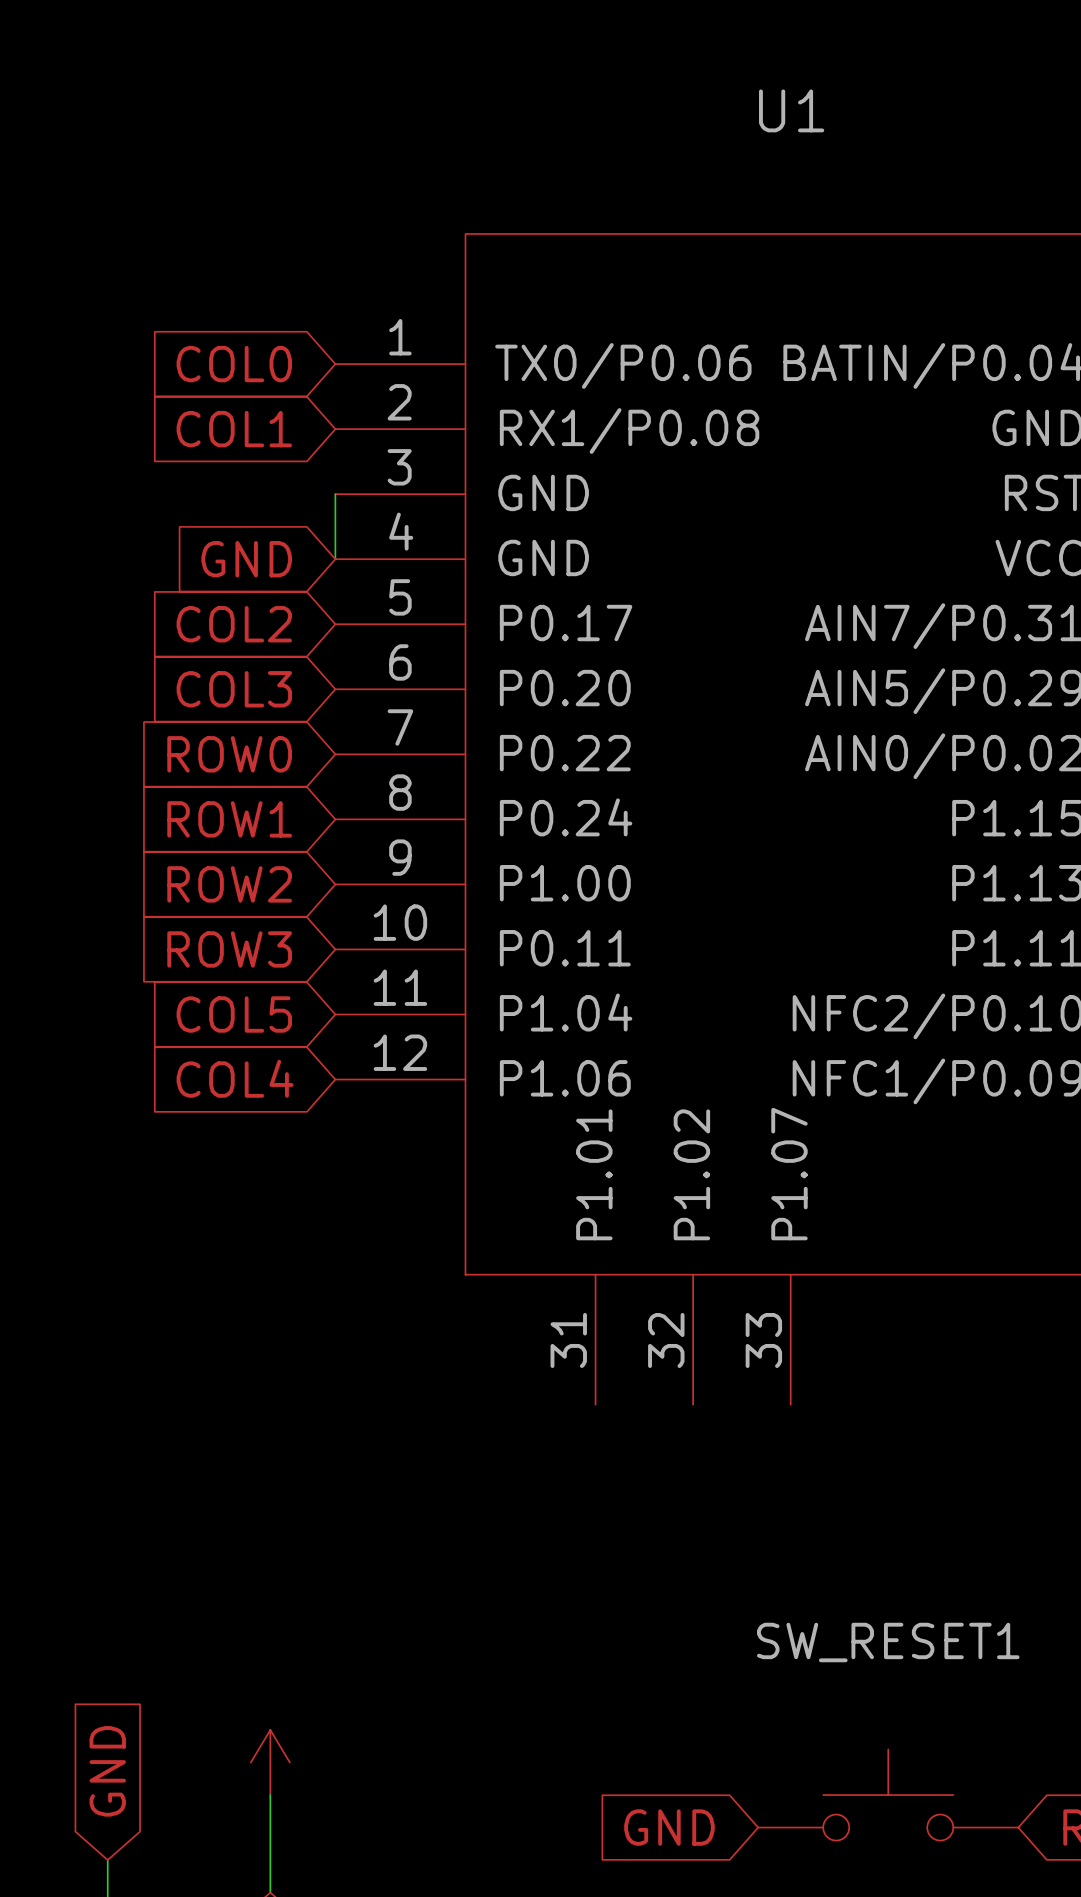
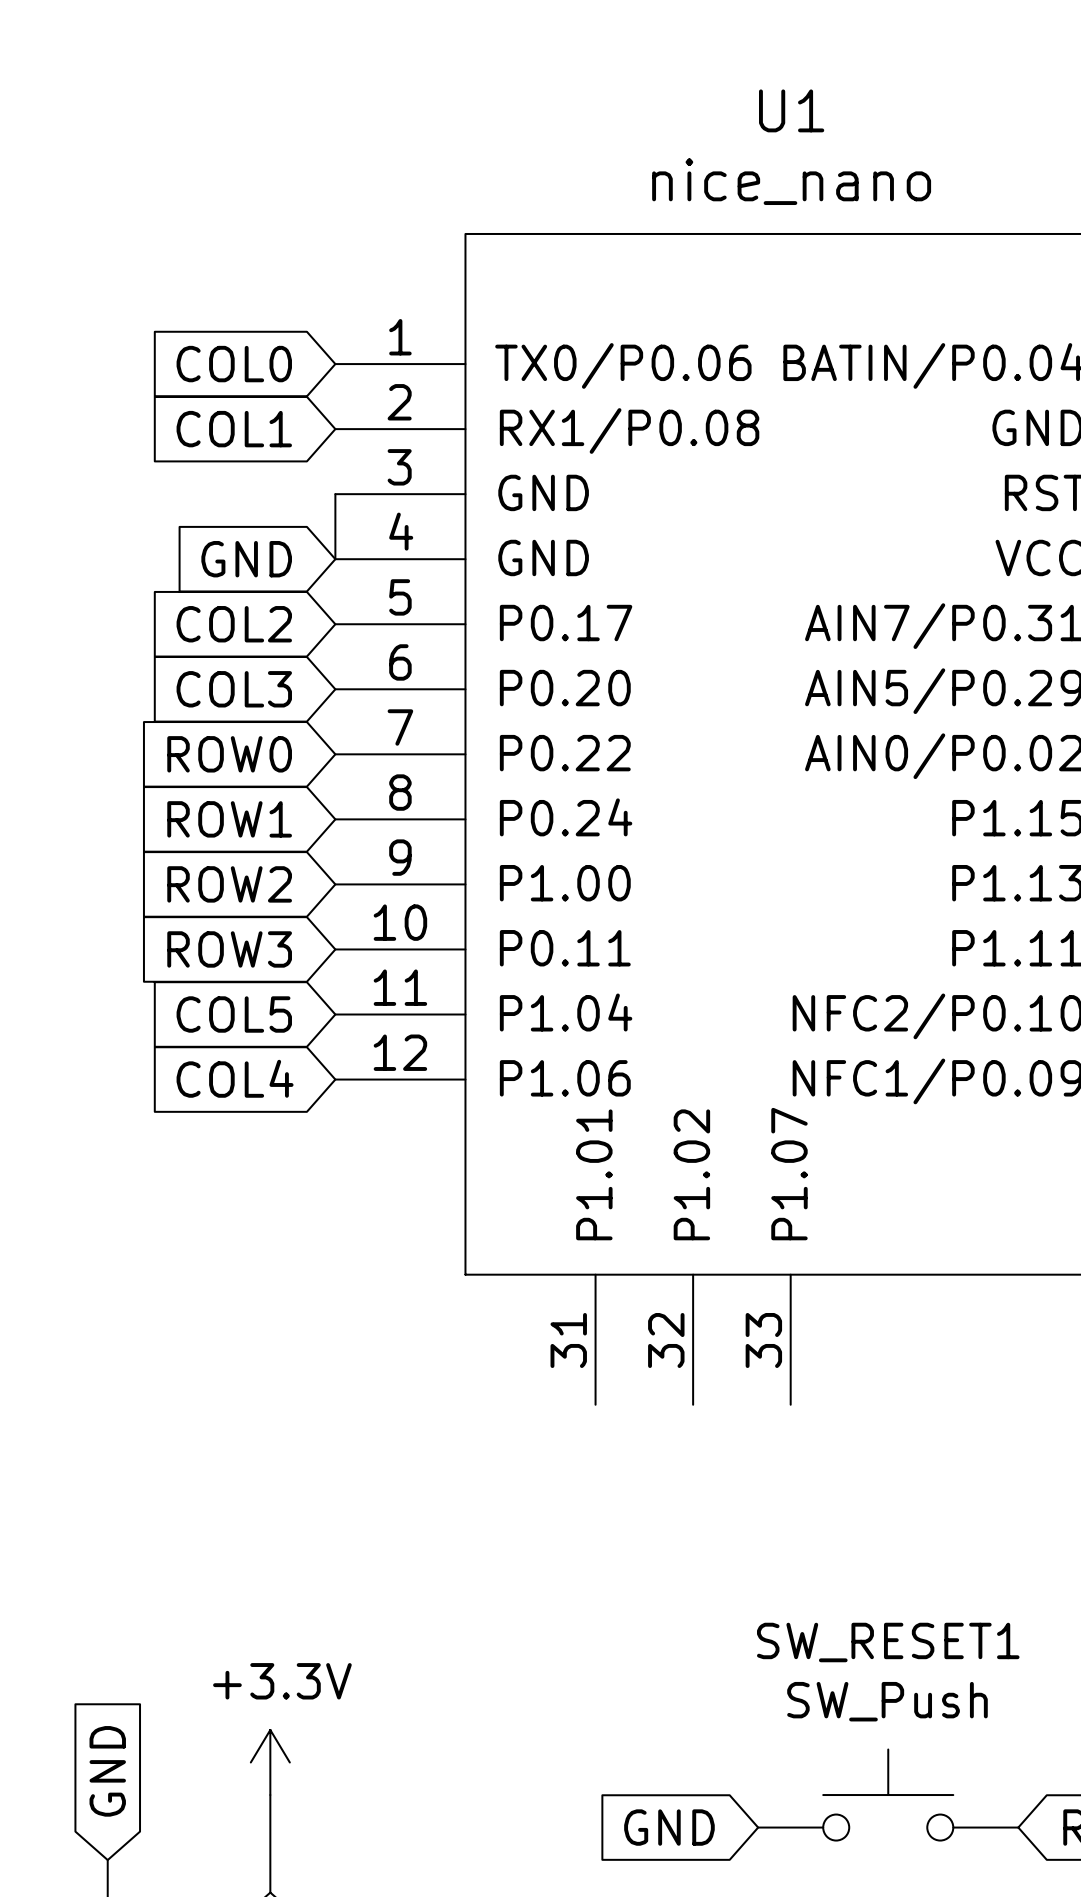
U1 value: none -> nice_nano (791, 181)
power symbol text: none -> +3.3V (282, 1681)
SW_RESET1 value: none -> SW_Push (887, 1701)

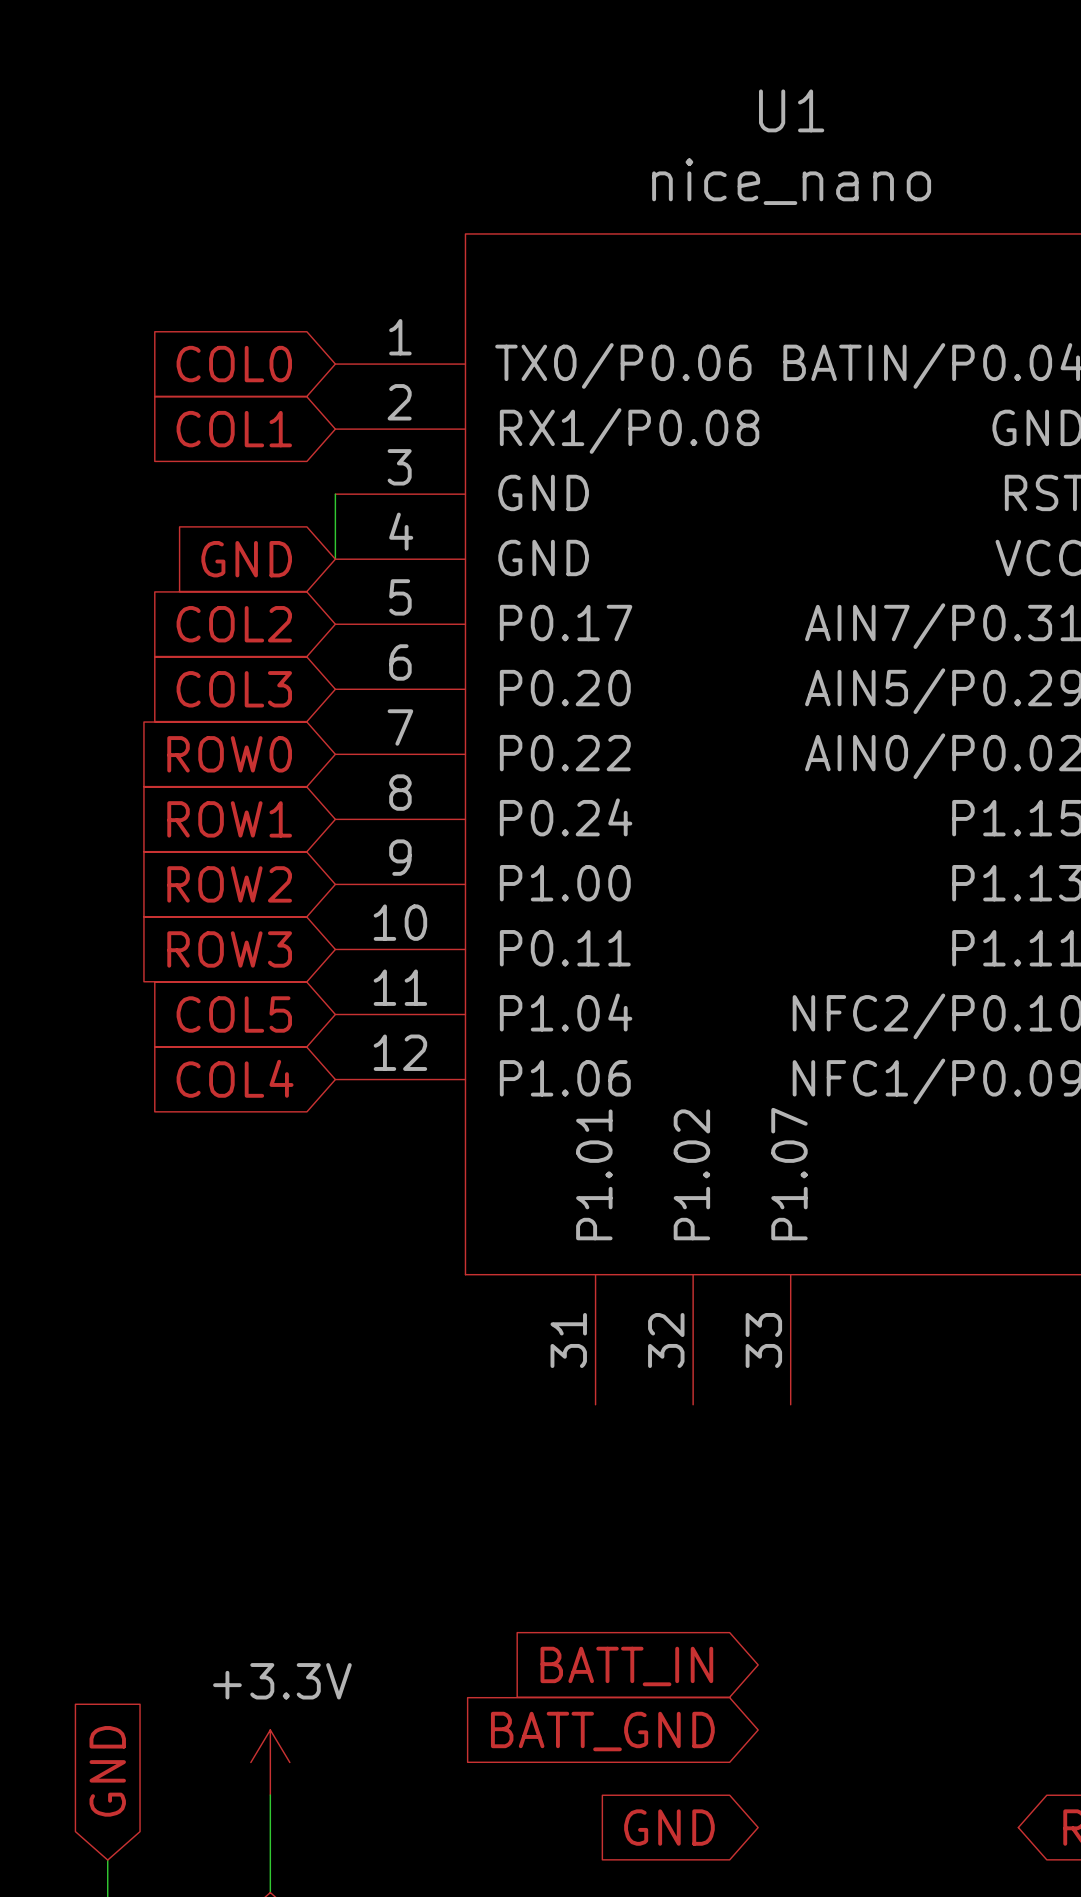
global label: none -> BATT_IN (626, 1666)
global label: none -> BATT_GND (602, 1731)
SW_RESET1: SW_Push (888, 1795) -> none

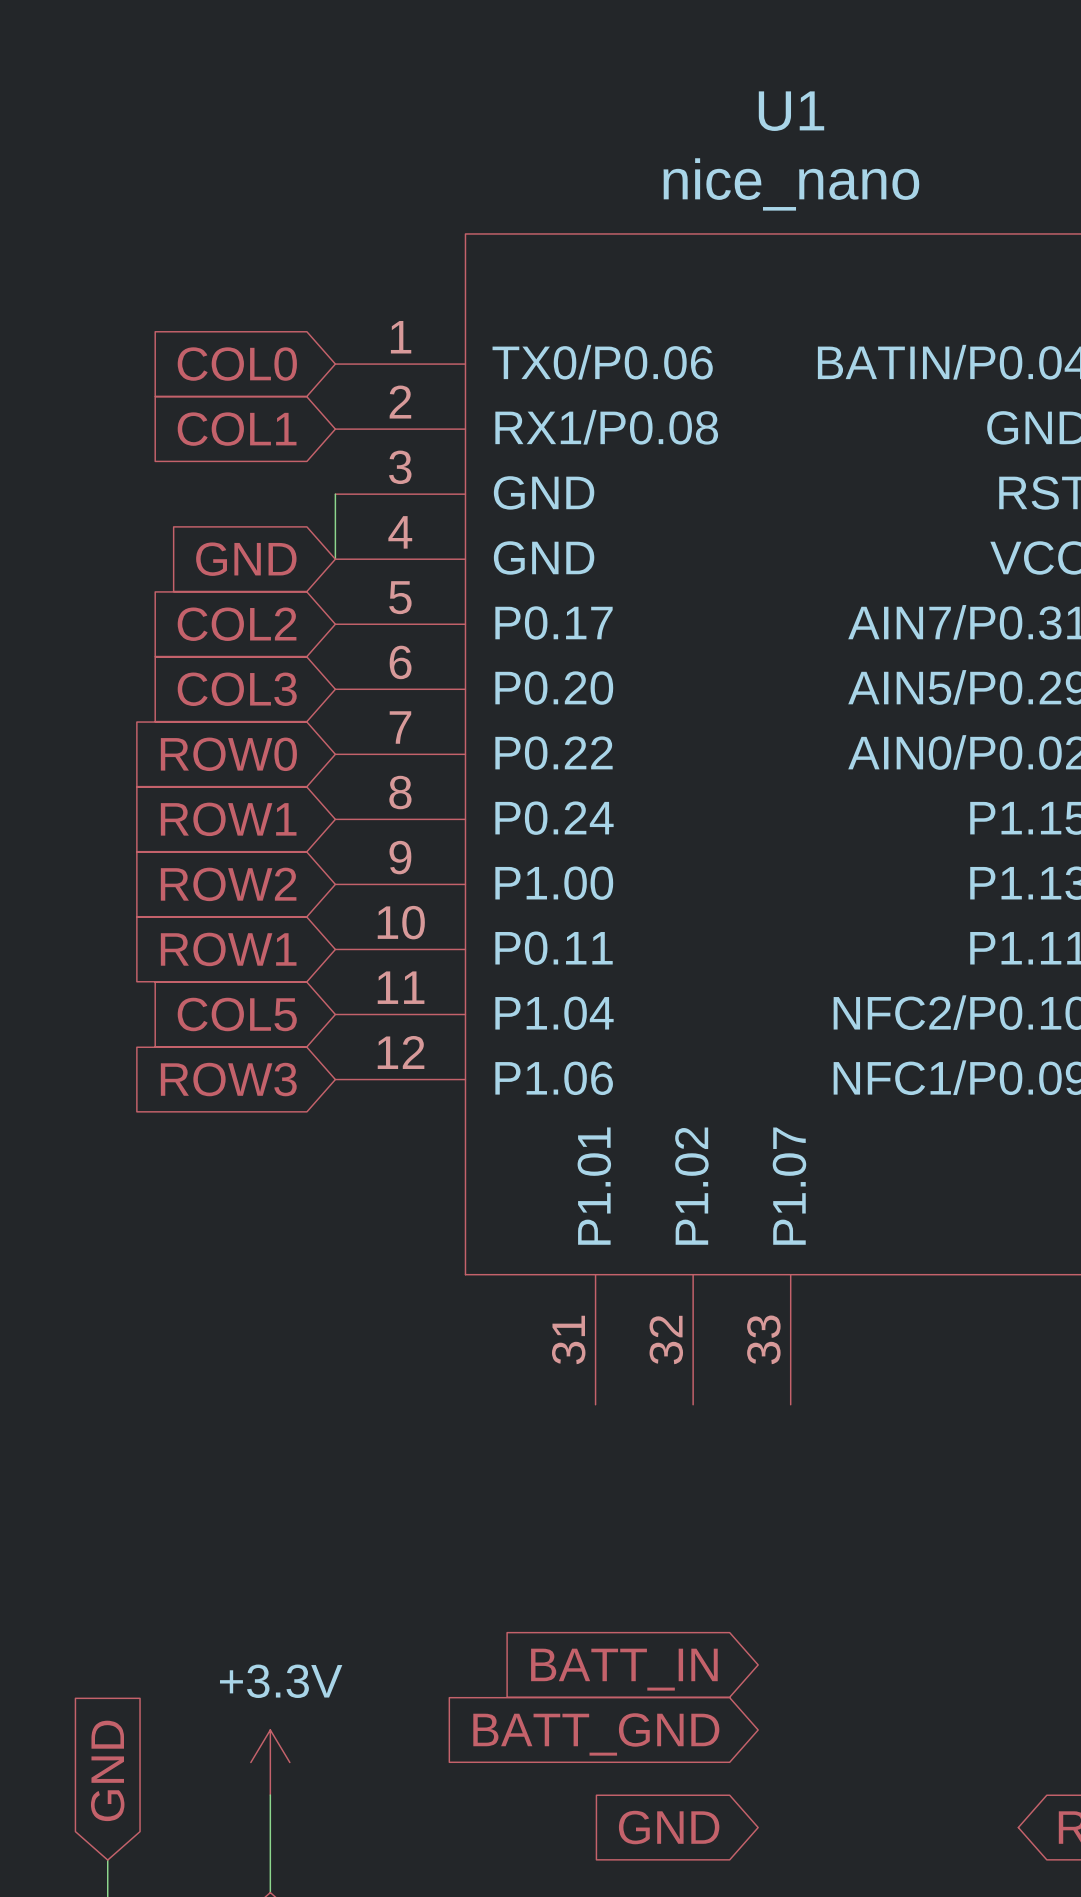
global label: ROW3 (229, 949) -> ROW1 (228, 949)
global label: COL4 (235, 1078) -> ROW3 (228, 1079)

